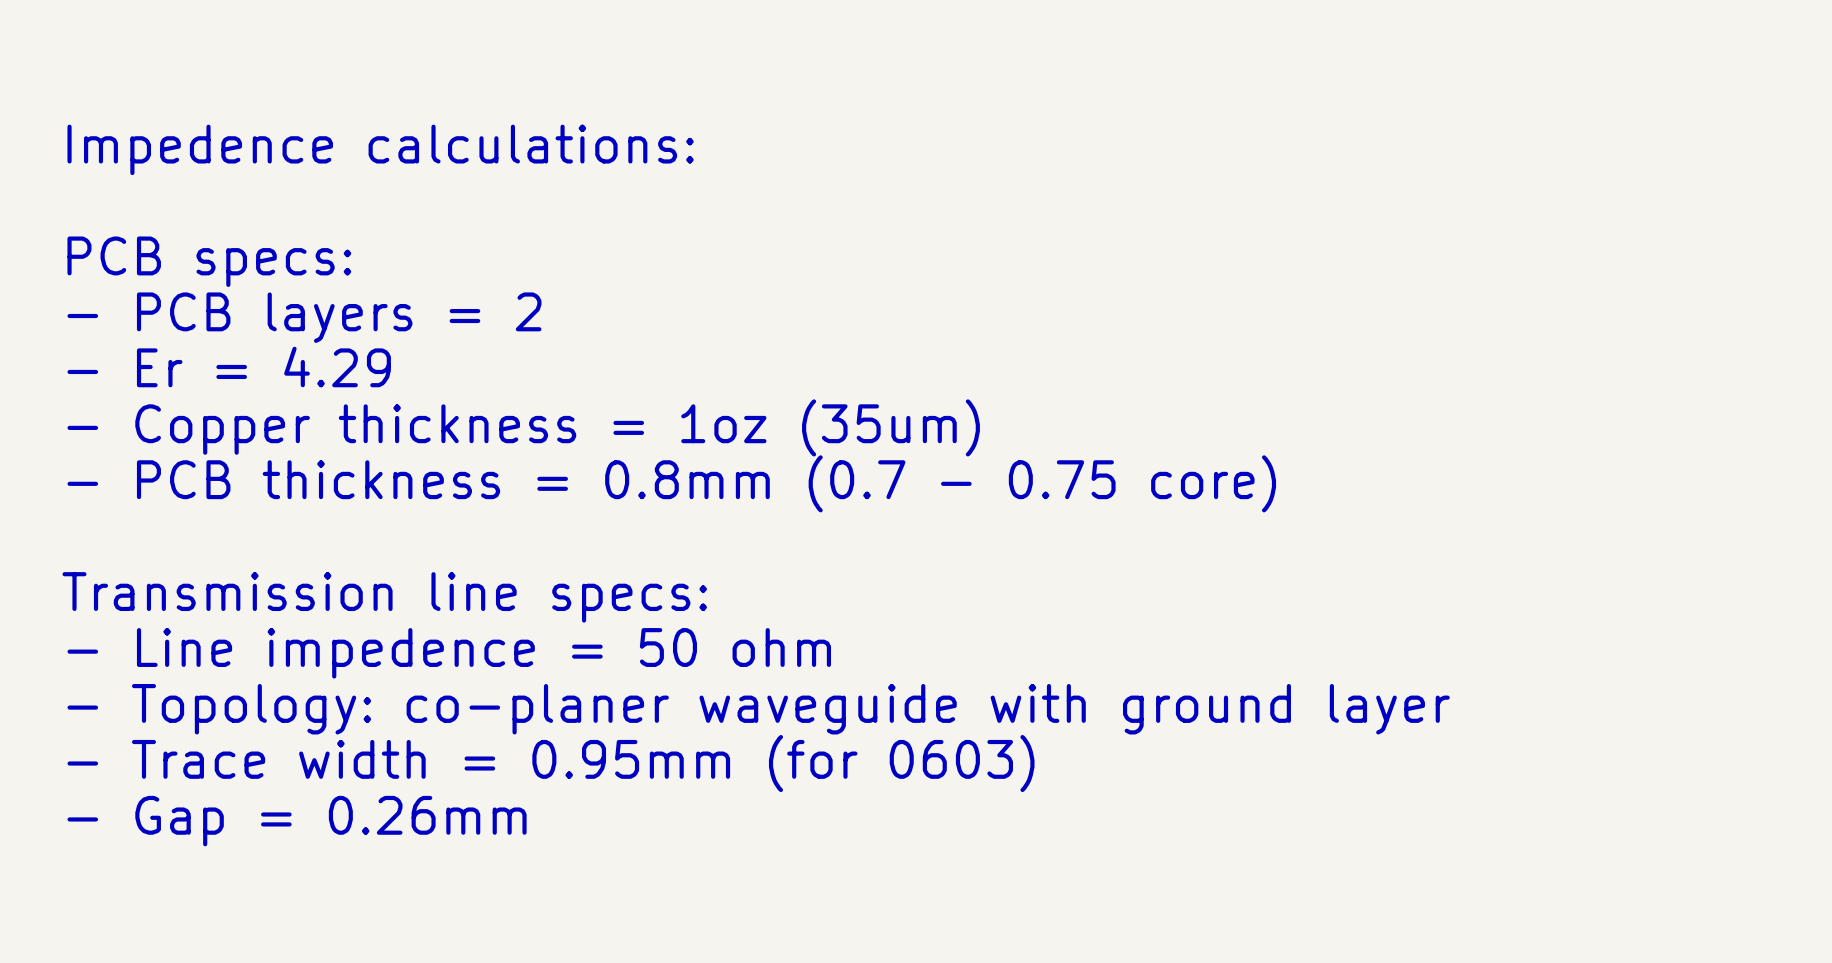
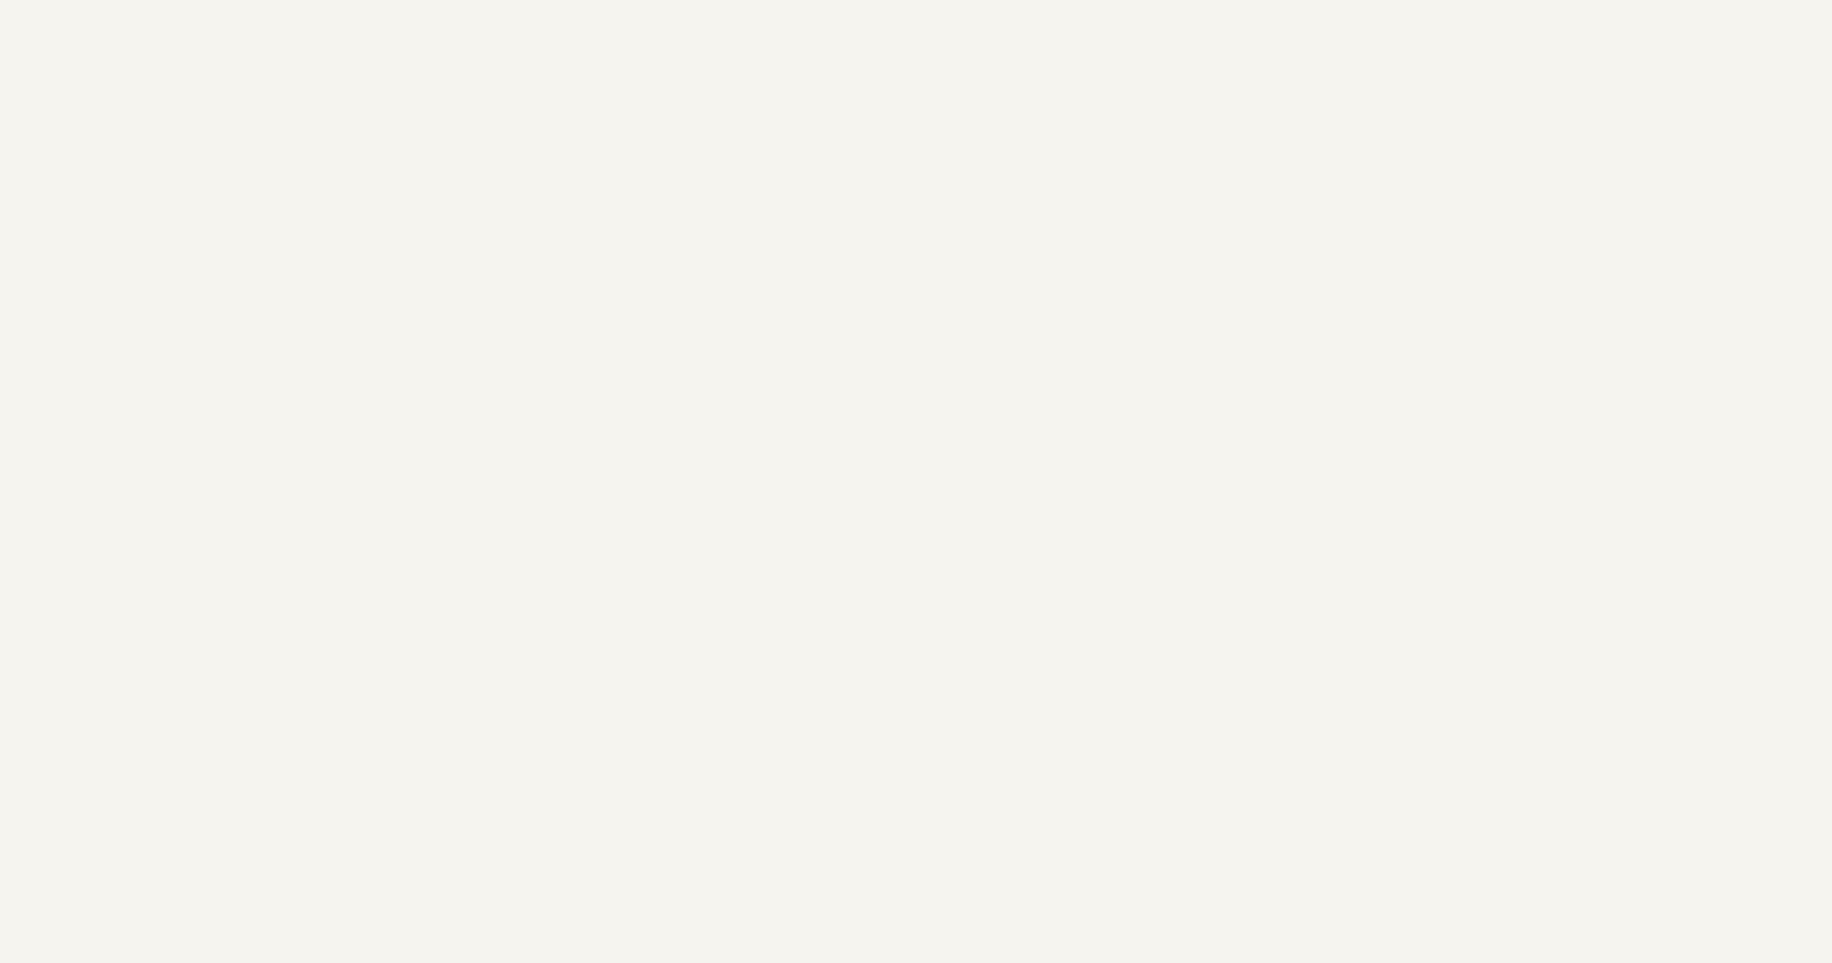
text: Impedence calculations: (380, 149) -> none
text: PCB specs: (209, 261) -> none
text: - PCB layers = 2 (304, 317) -> none
text: - Er = 4.29 (229, 366) -> none
text: - Copper thickness = 1oz (35um) (523, 427) -> none
text: - PCB thickness = 0.8mm (0.7 - 0.75 core) (671, 483) -> none
text: Transmission line specs: (384, 597) -> none
text: - Line impedence = 50 ohm (449, 653) -> none
text: - Topology: co-planer waveguide with ground layer (758, 709) -> none
text: - Trace width = 0.95mm (for 0603) (550, 763) -> none
text: - Gap = 0.26mm (297, 821) -> none

